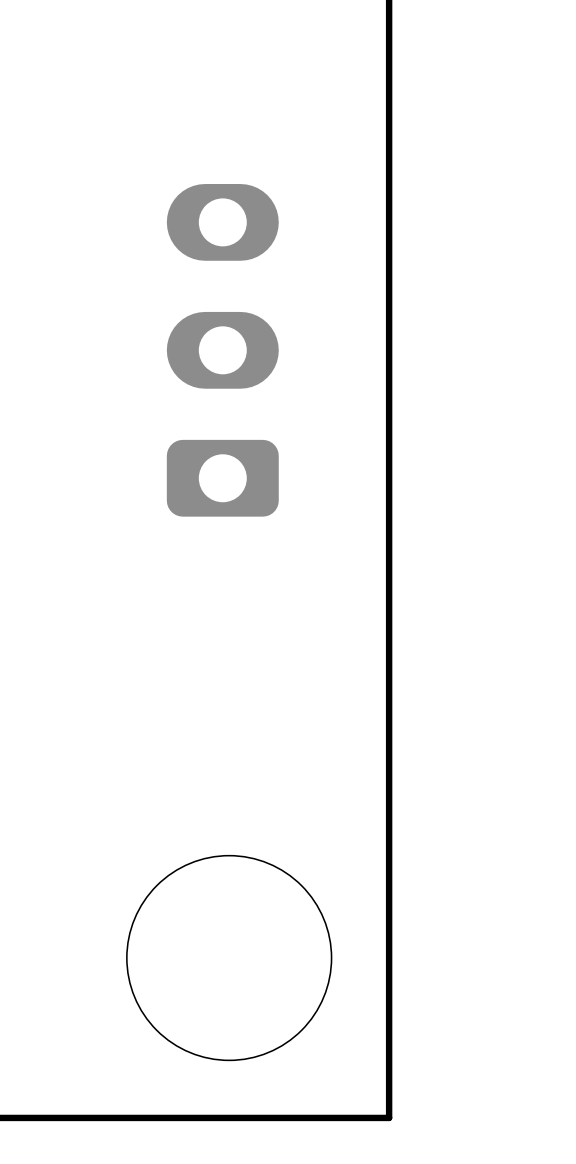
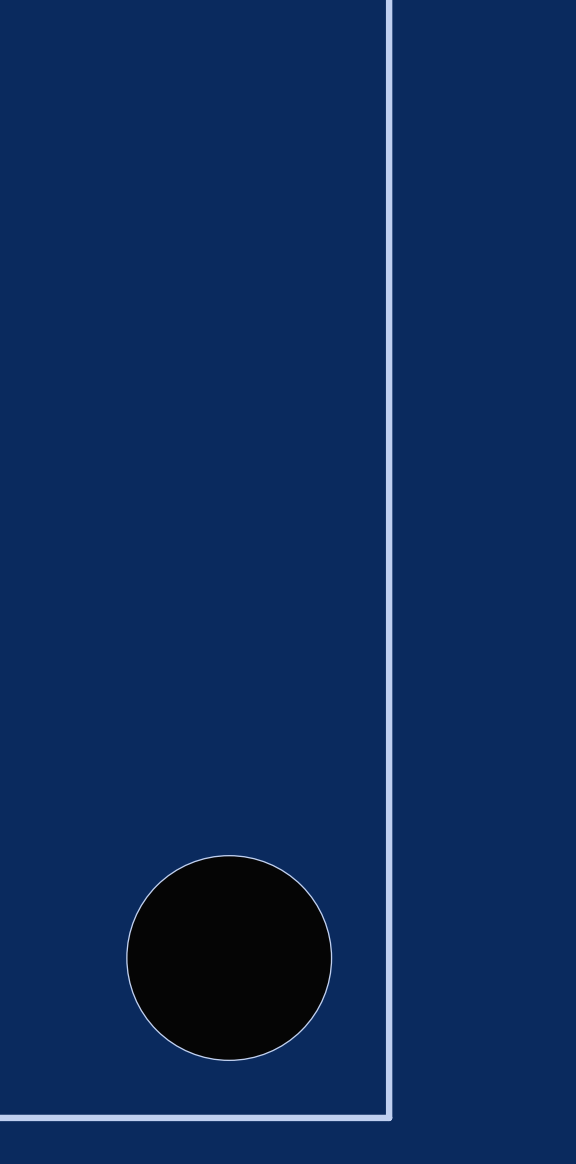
part: (222, 350) -> none

